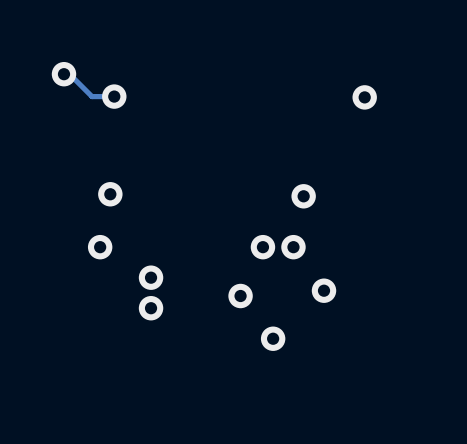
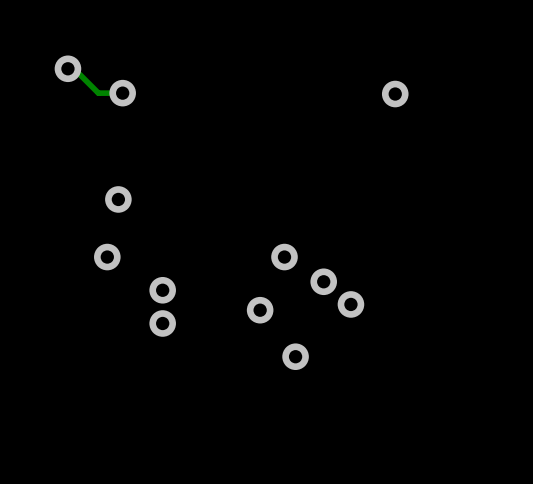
via: (303, 196) -> none
via position: (293, 247) -> (323, 281)

